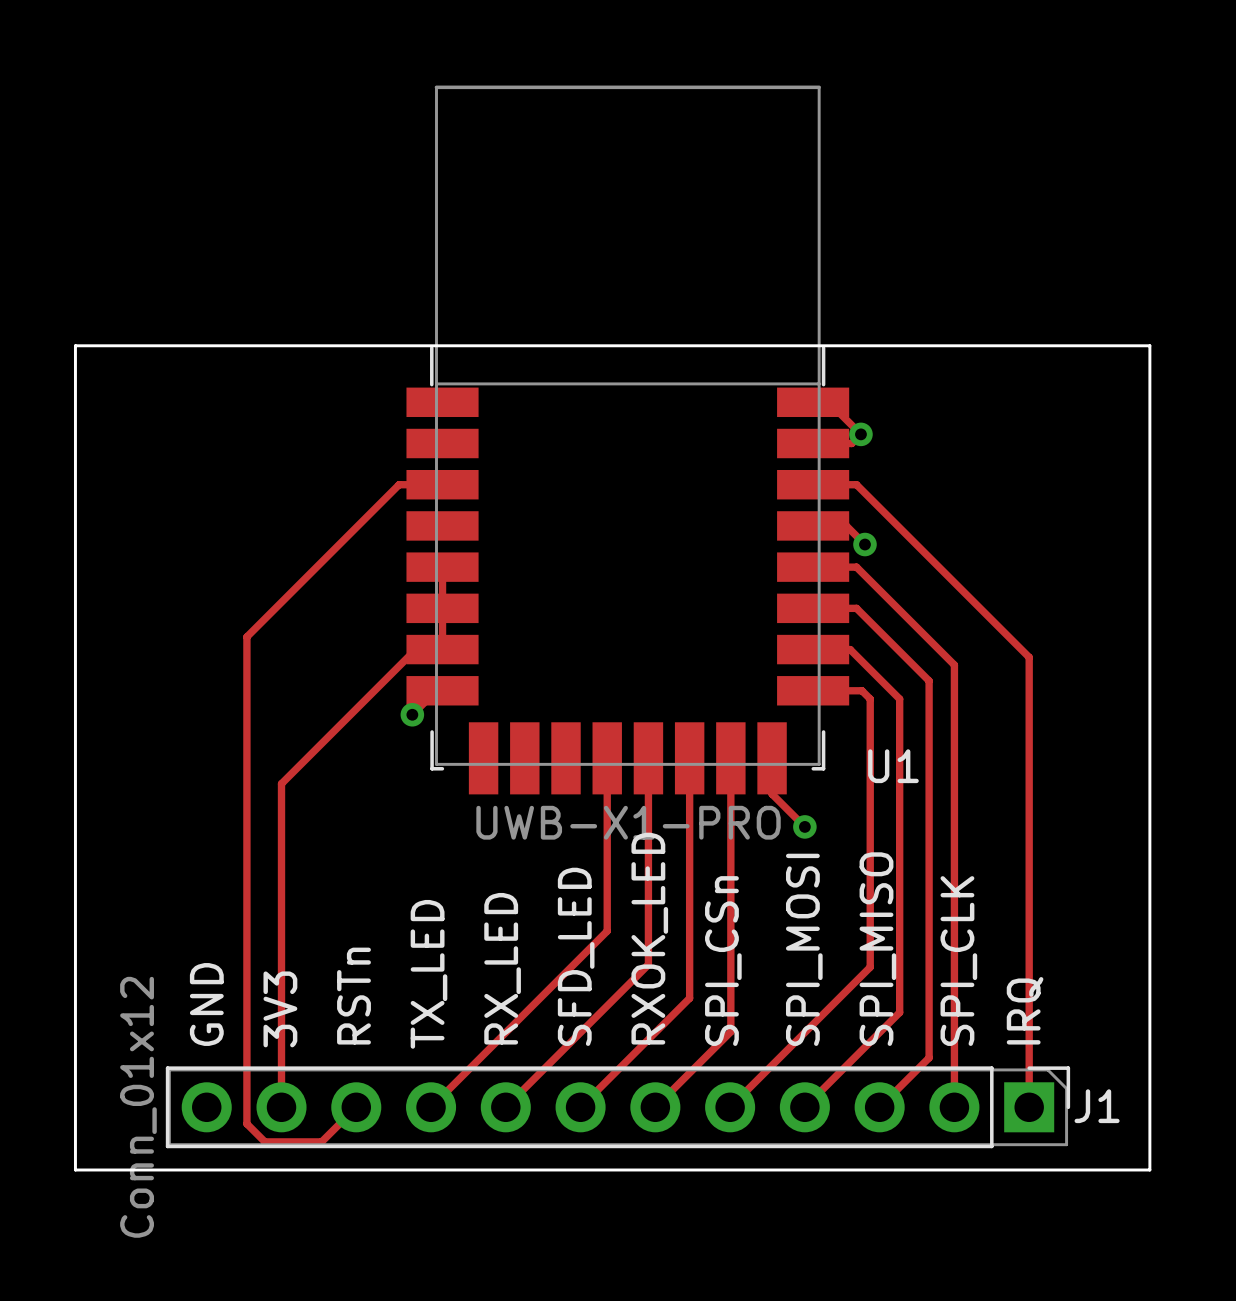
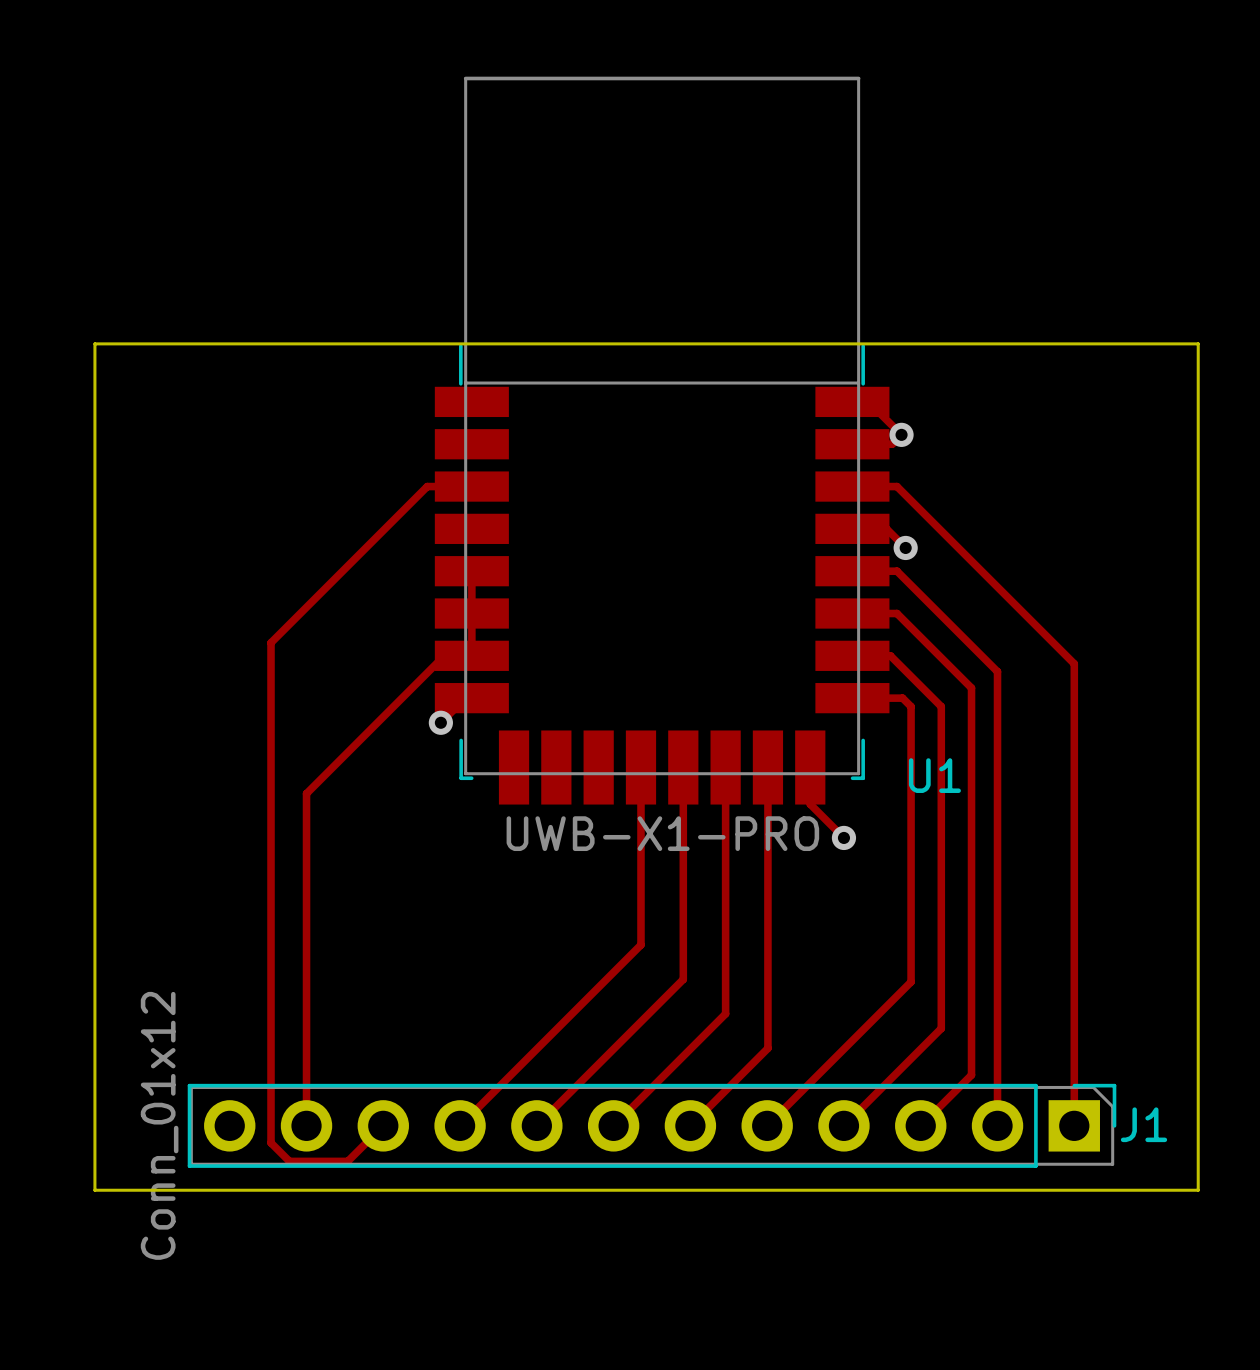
text: RXOK_LED (649, 938) -> none
text: SPI_MOSI (804, 949) -> none
text: SPI_MISO (877, 949) -> none
text: SFD_LED (576, 956) -> none
text: SPI_CSn (723, 961) -> none
text: SPI_CLK (958, 961) -> none
text: RX_LED (502, 968) -> none
text: TX_LED (428, 974) -> none
text: RSTn (354, 996) -> none
text: GND (206, 1004) -> none
text: 3V3 (280, 1009) -> none
text: IRQ (1025, 1010) -> none

